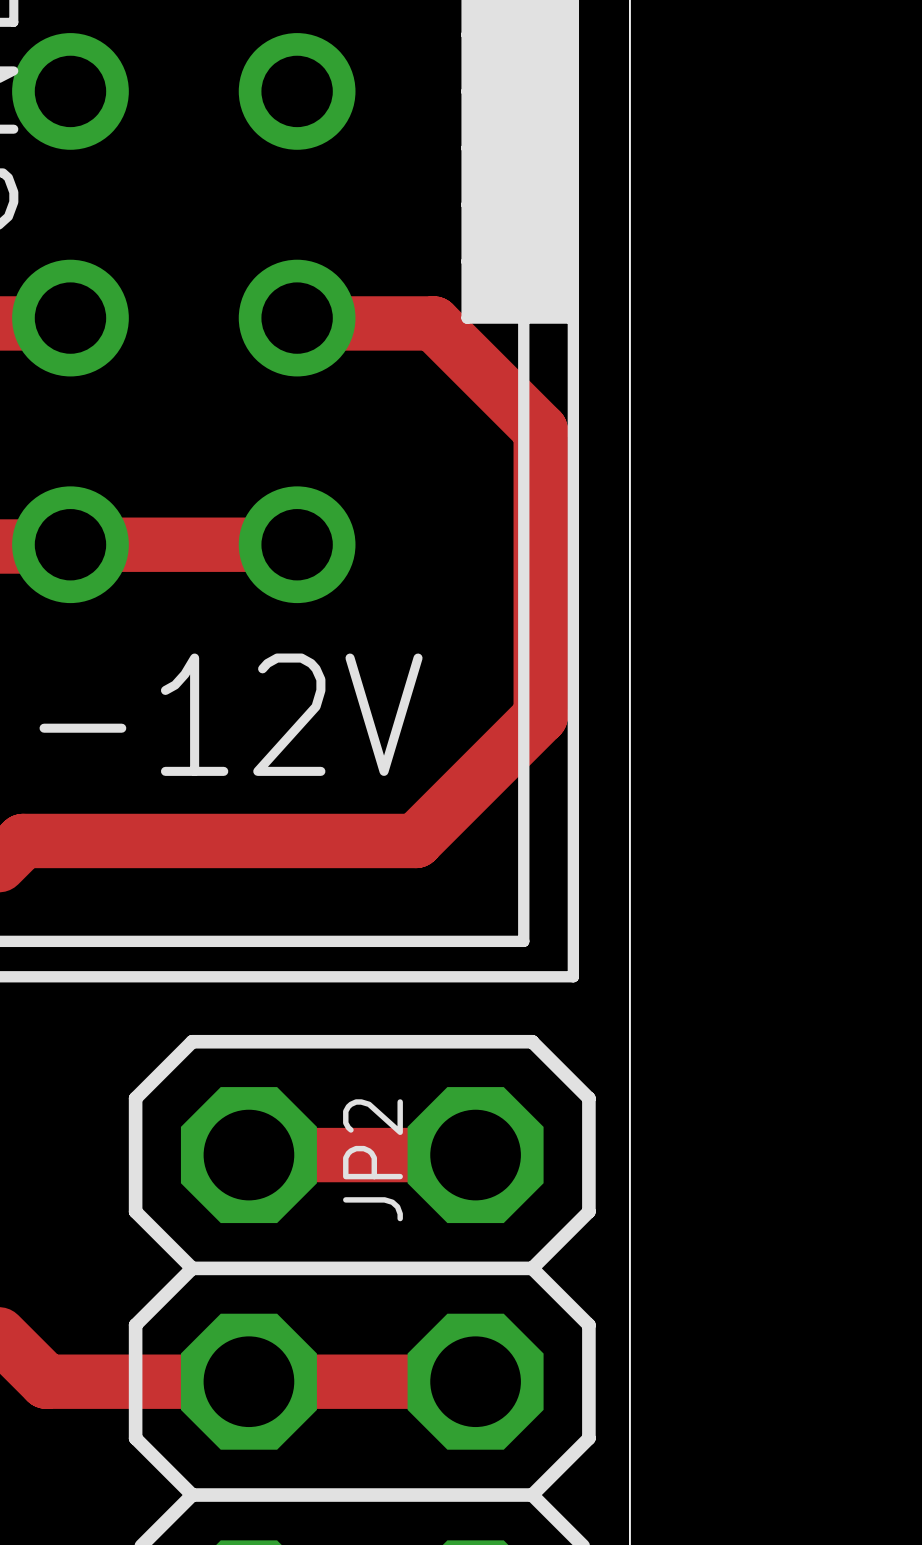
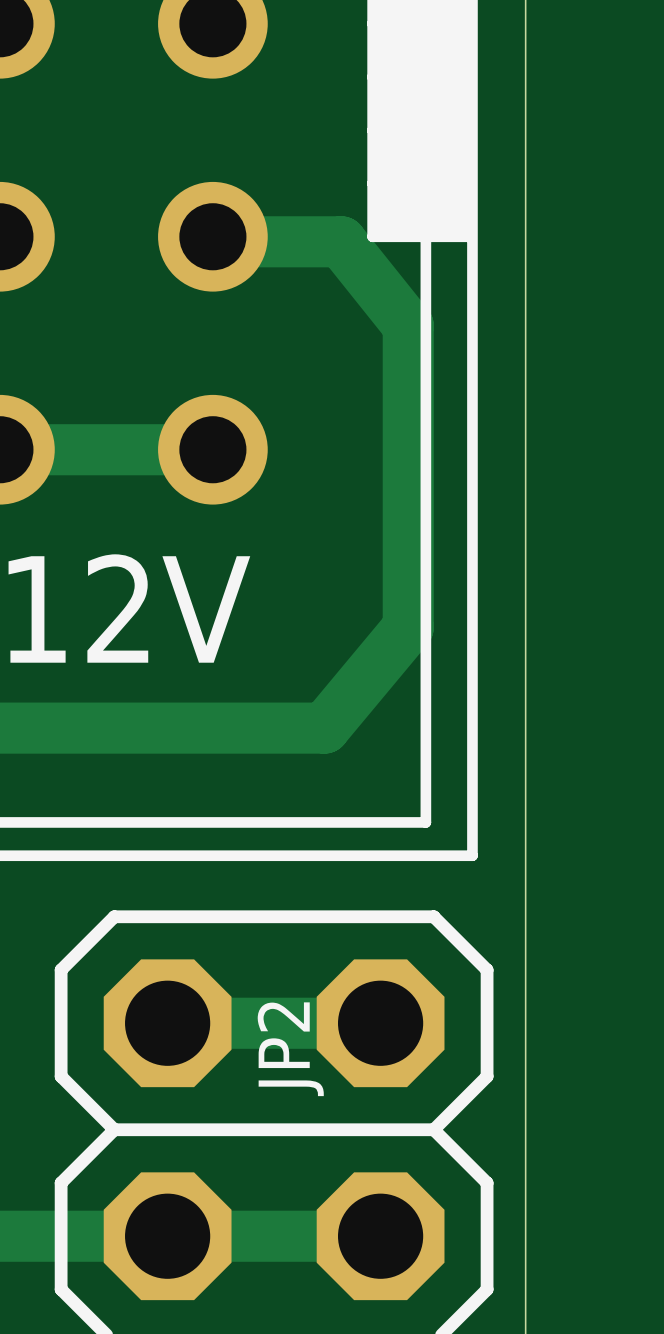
track: (433, 323) (540, 430) (540, 716) (415, 840) -> (341, 241) (408, 325) (408, 627) (324, 728)

